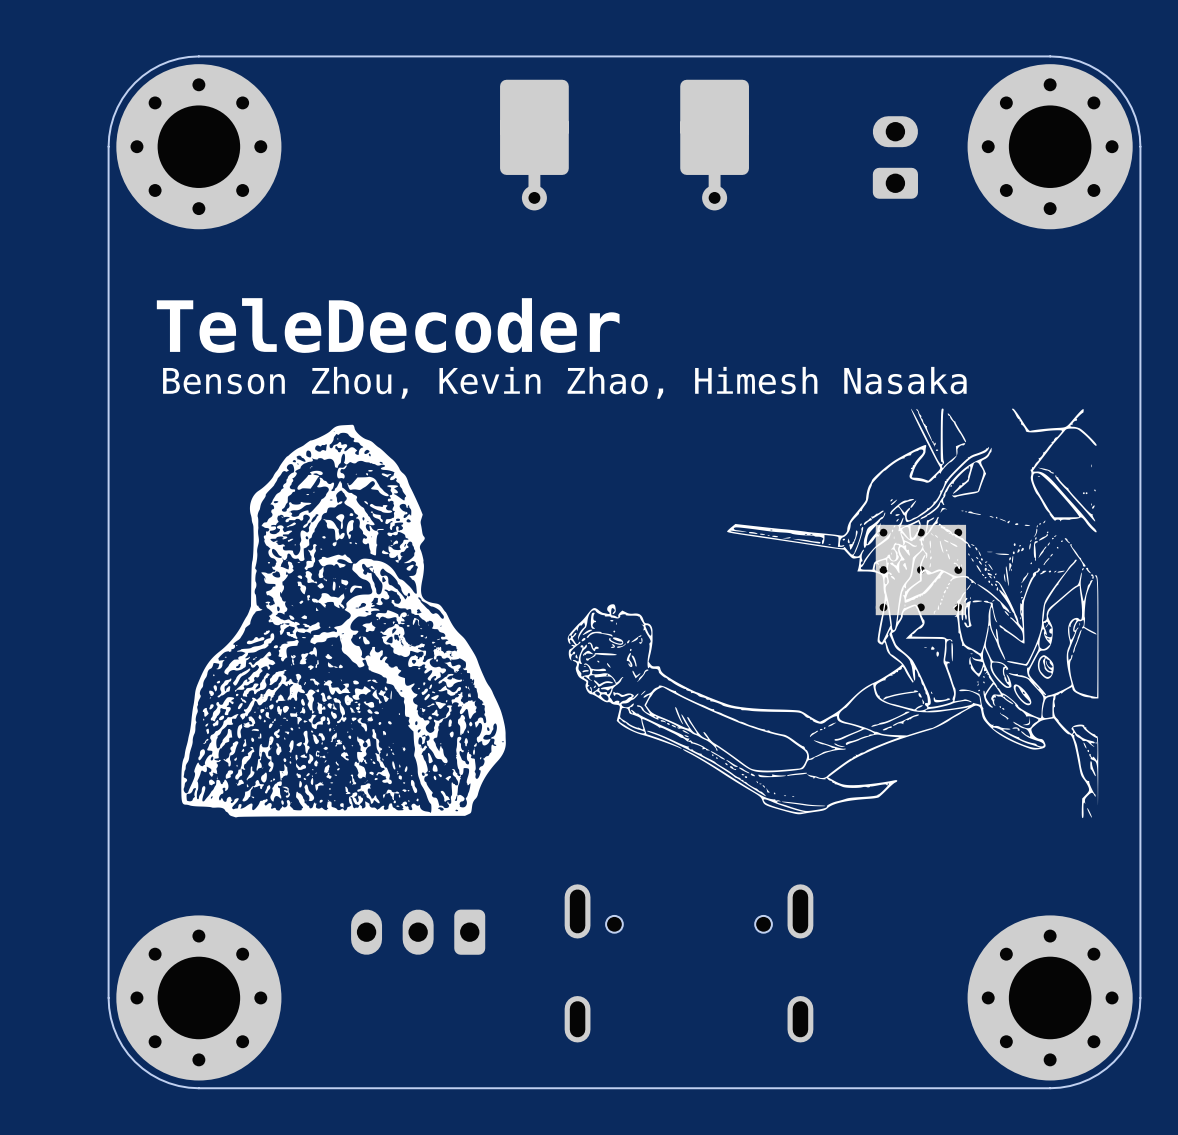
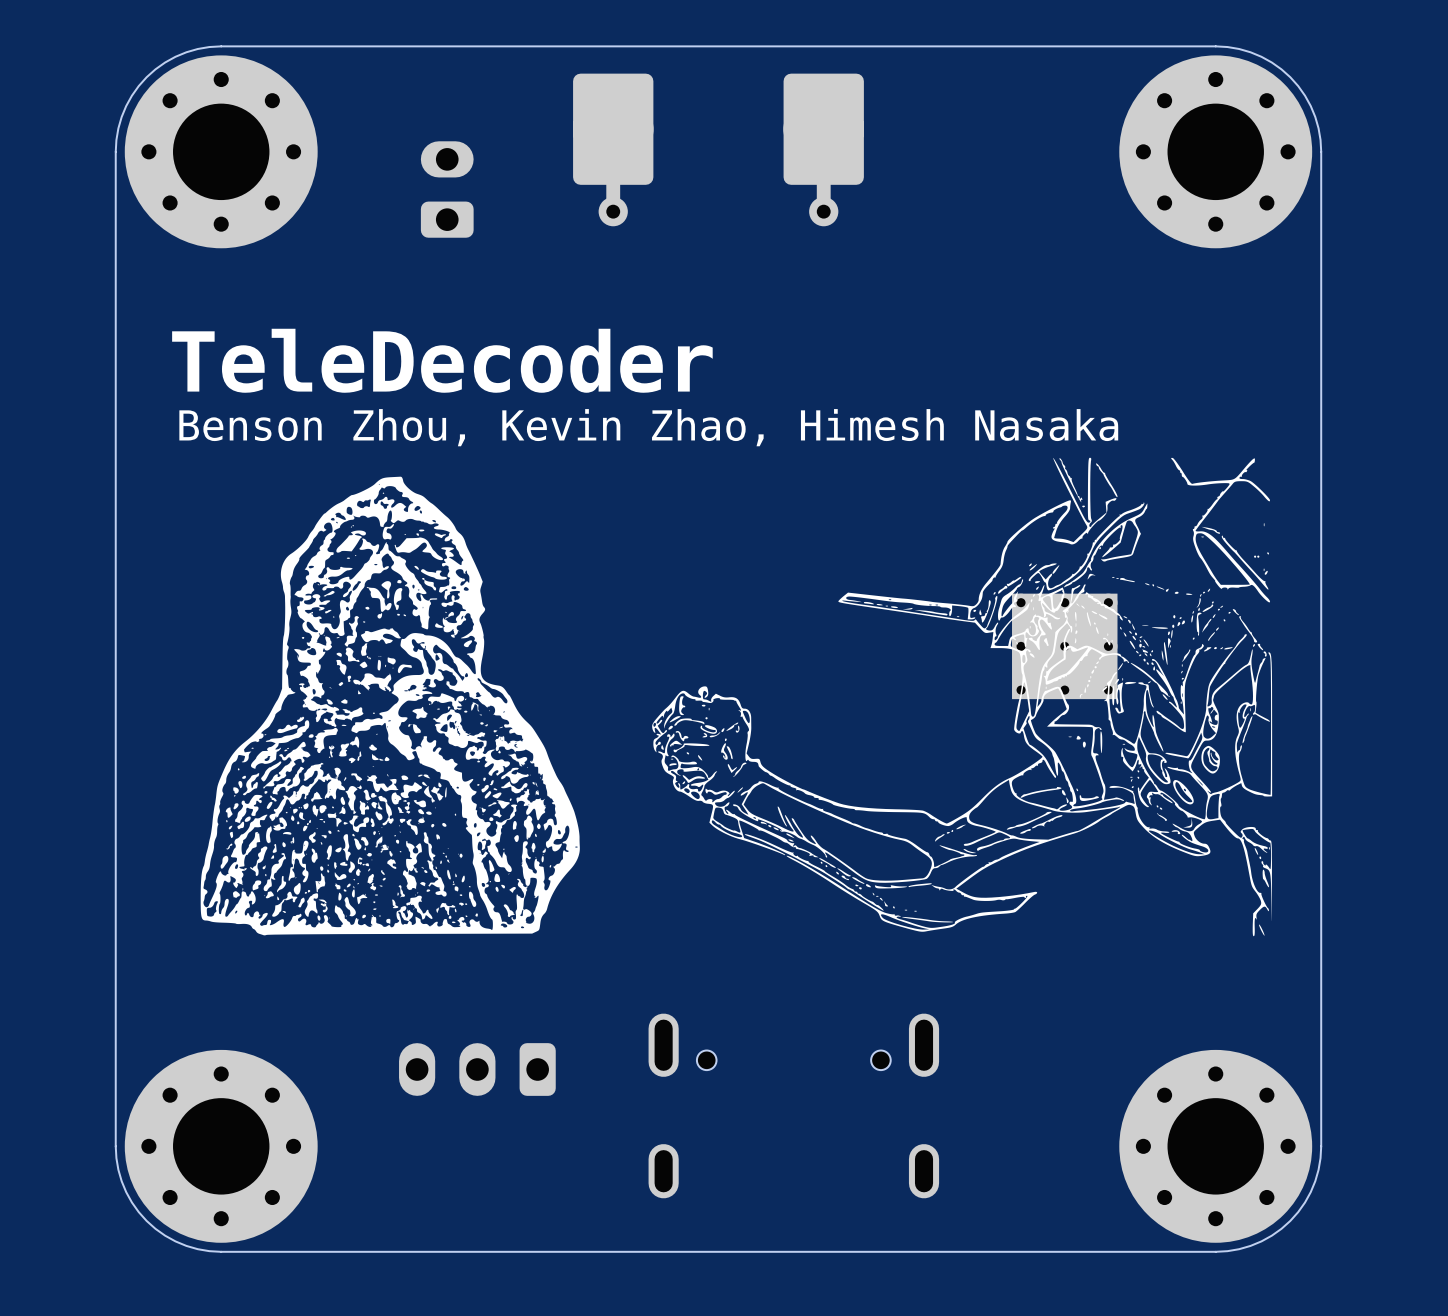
part position: (895, 157) -> (447, 189)

